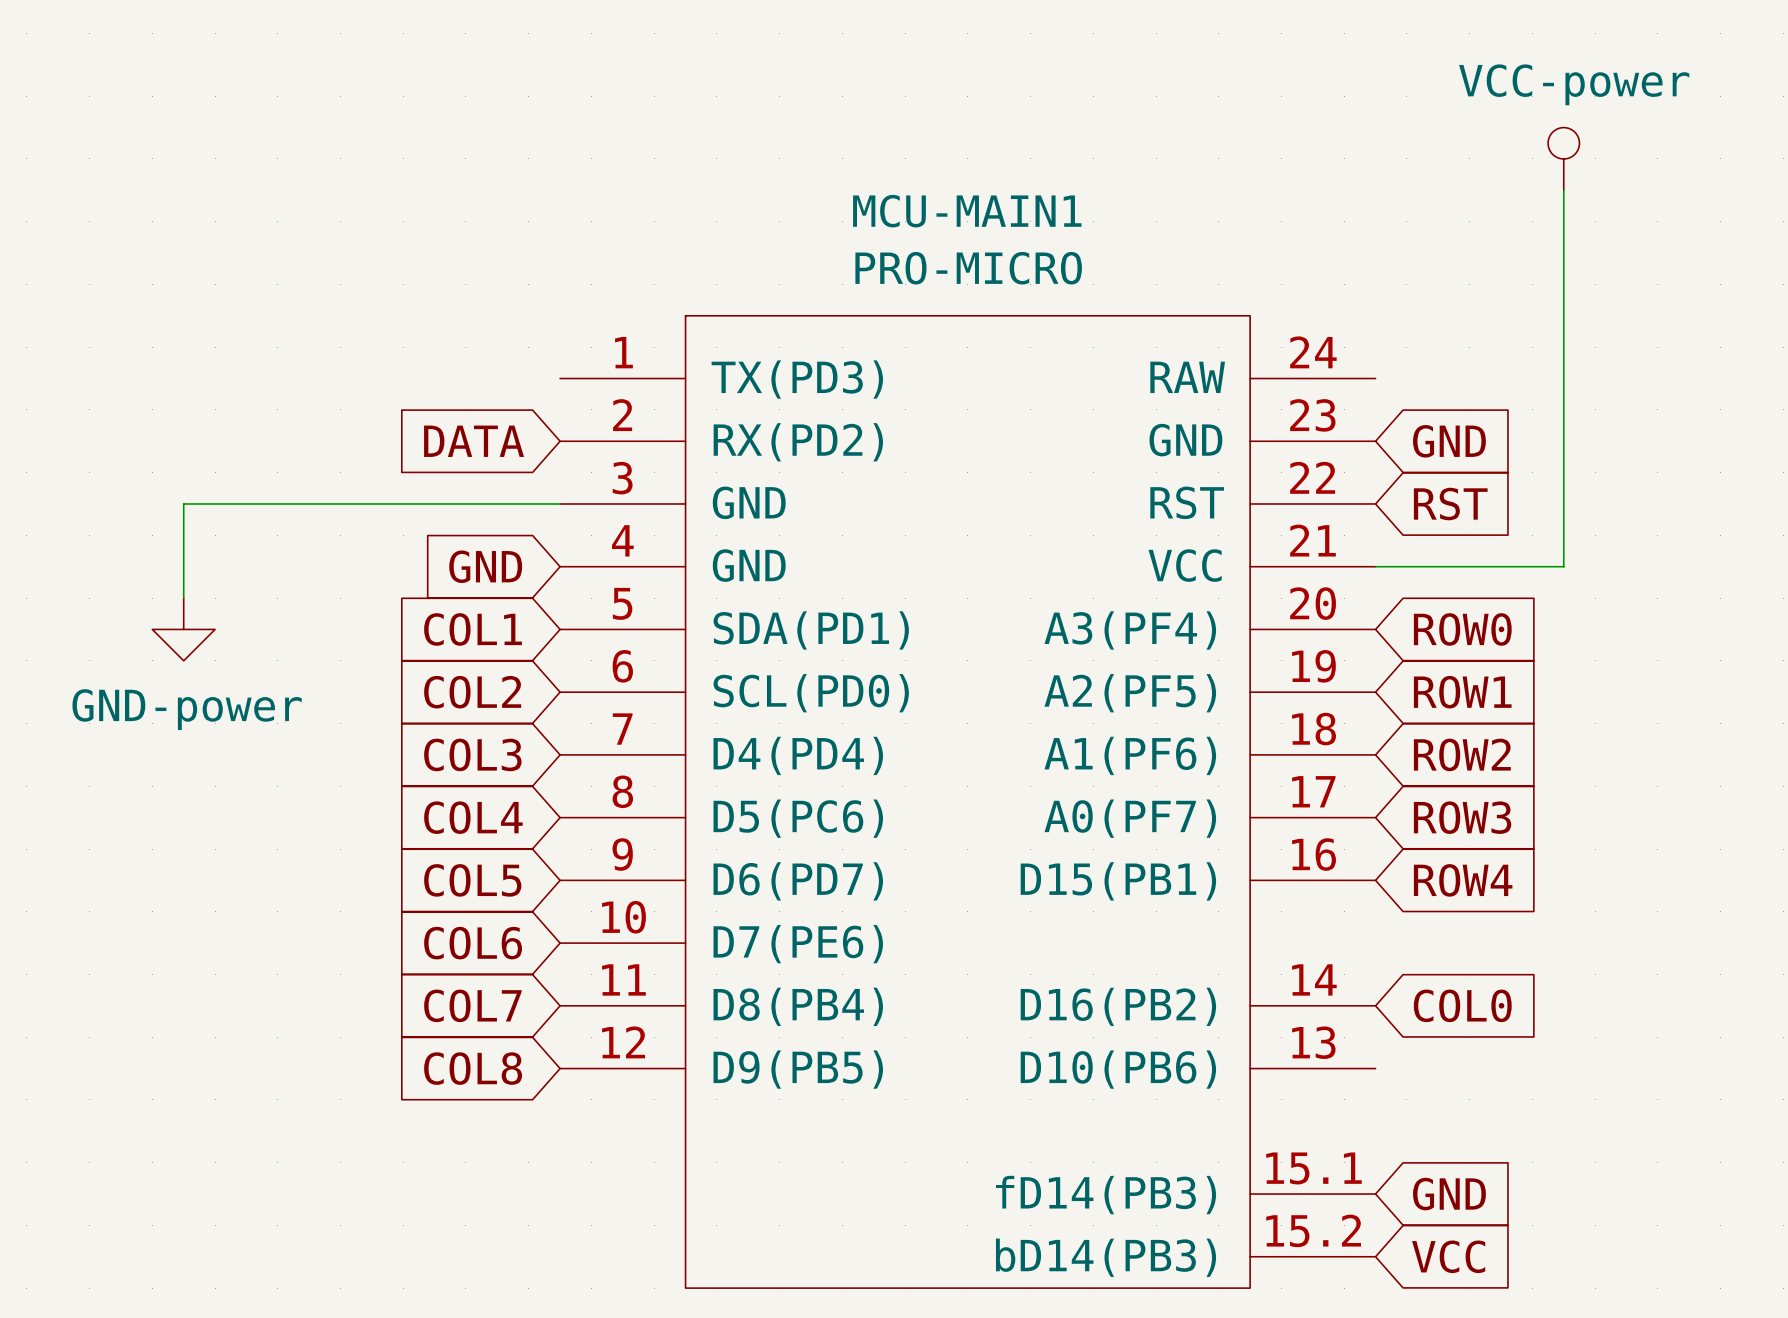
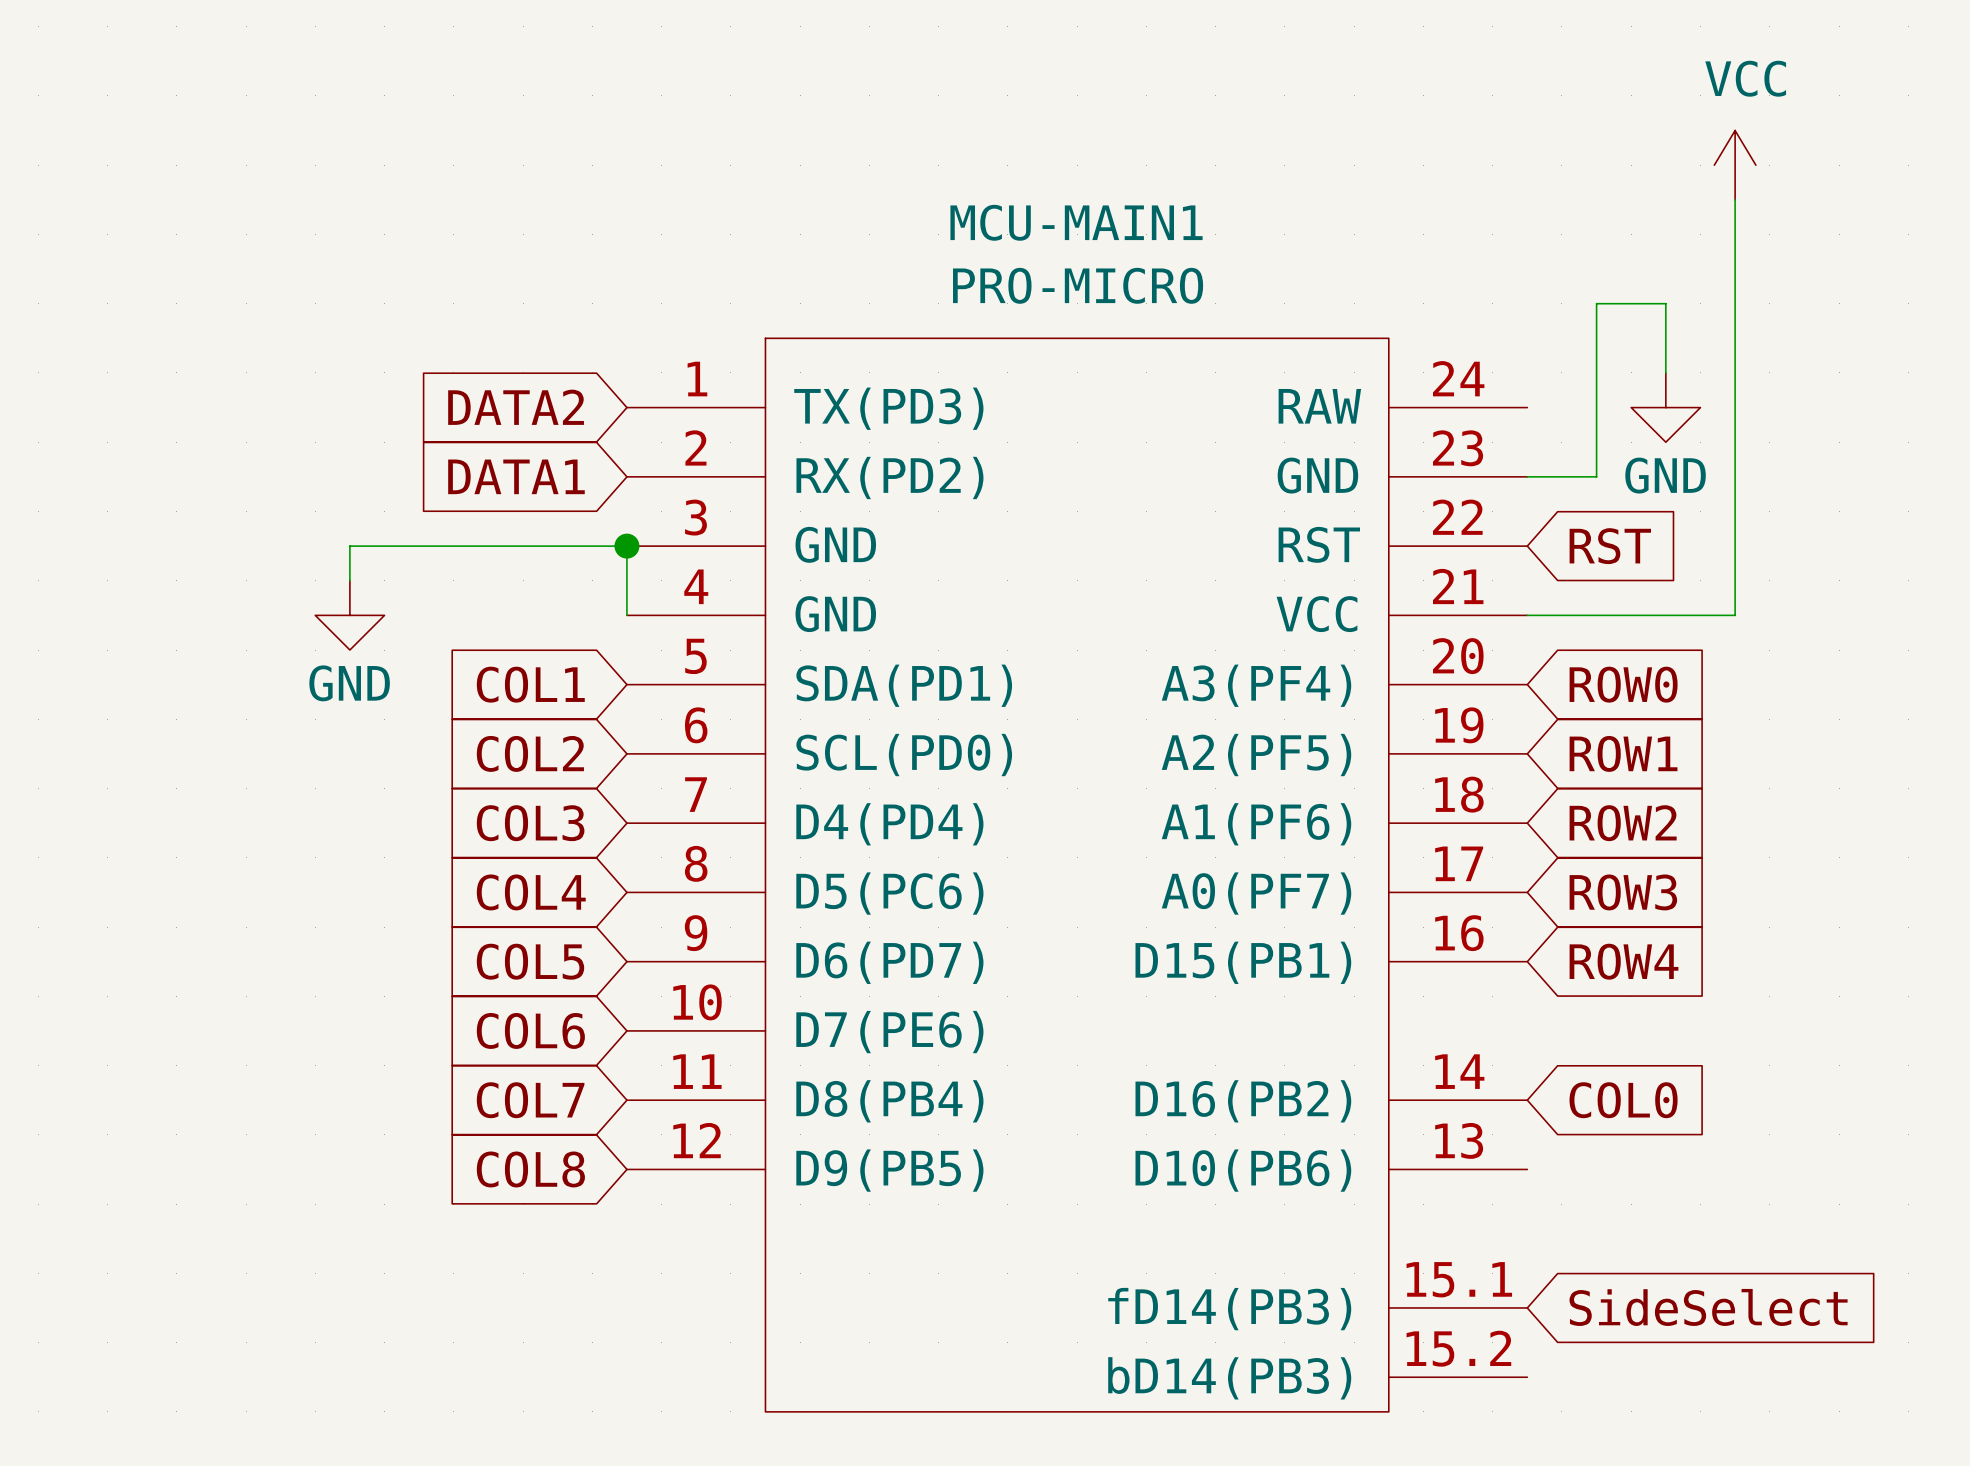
power symbol: VCC-power (1563, 158) -> VCC (1735, 165)
wire: none -> (1665, 372) (1665, 303) (1596, 303) (1596, 476) (1527, 476)
global label: none -> DATA2 (516, 407)
power symbol: none -> GND (1665, 407)
global label: DATA (474, 441) -> DATA1 (516, 476)
global label: GND (1449, 441) -> none
wire: (309, 503) (183, 503) (183, 598) -> (349, 546) (349, 580)
wire: none -> (626, 546) (626, 615)
junction: none -> (626, 546)
power symbol: none -> GND (349, 615)
global label: GND (485, 566) -> none
power symbol: GND-power (183, 629) -> none
global label: GND (1449, 1194) -> SideSelect (1708, 1307)
global label: VCC (1448, 1256) -> none

